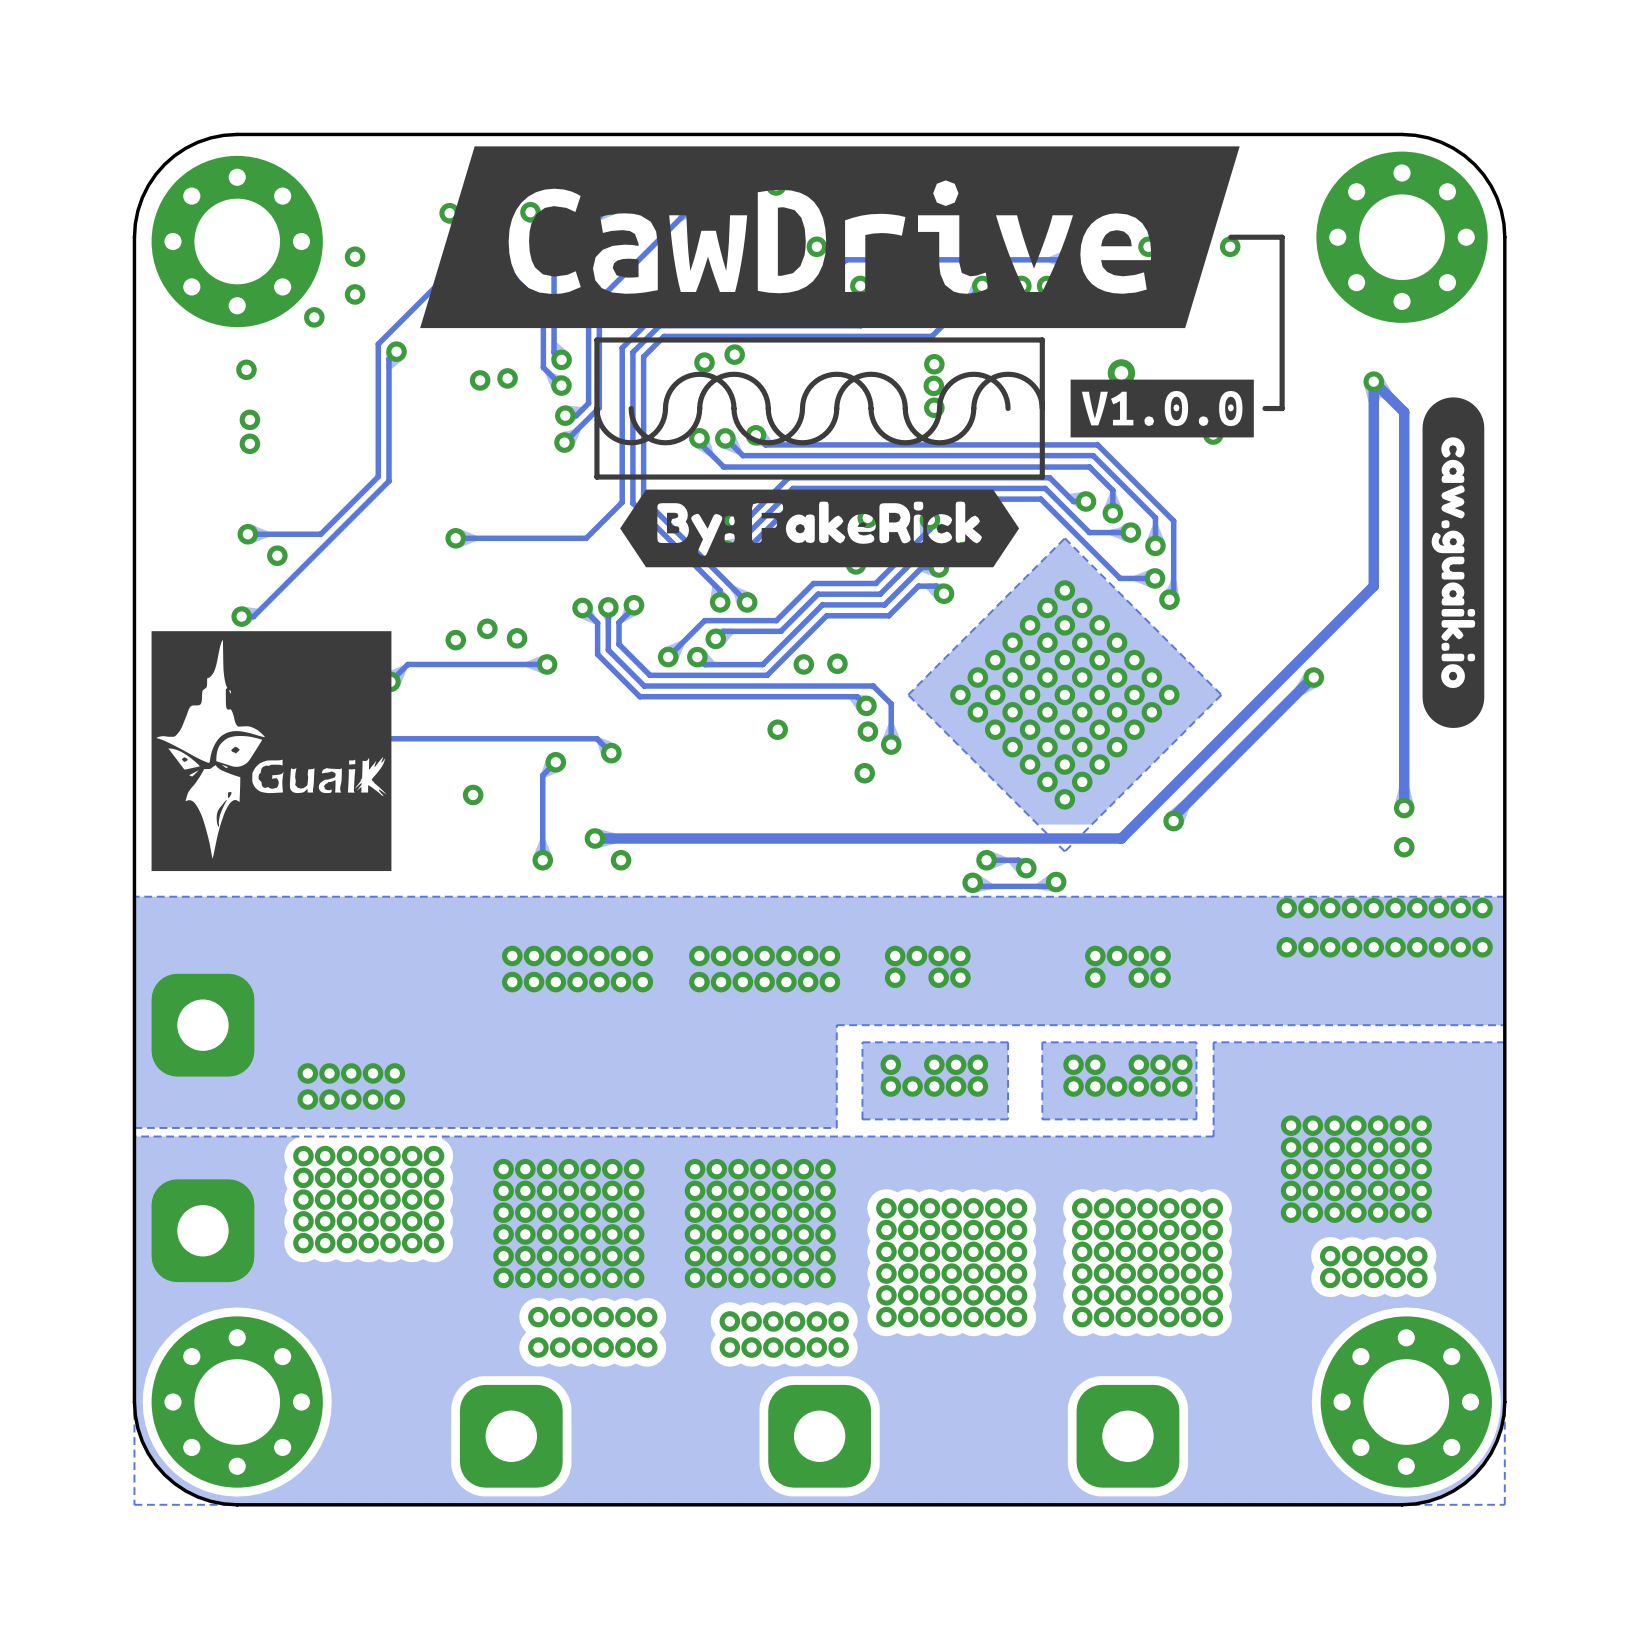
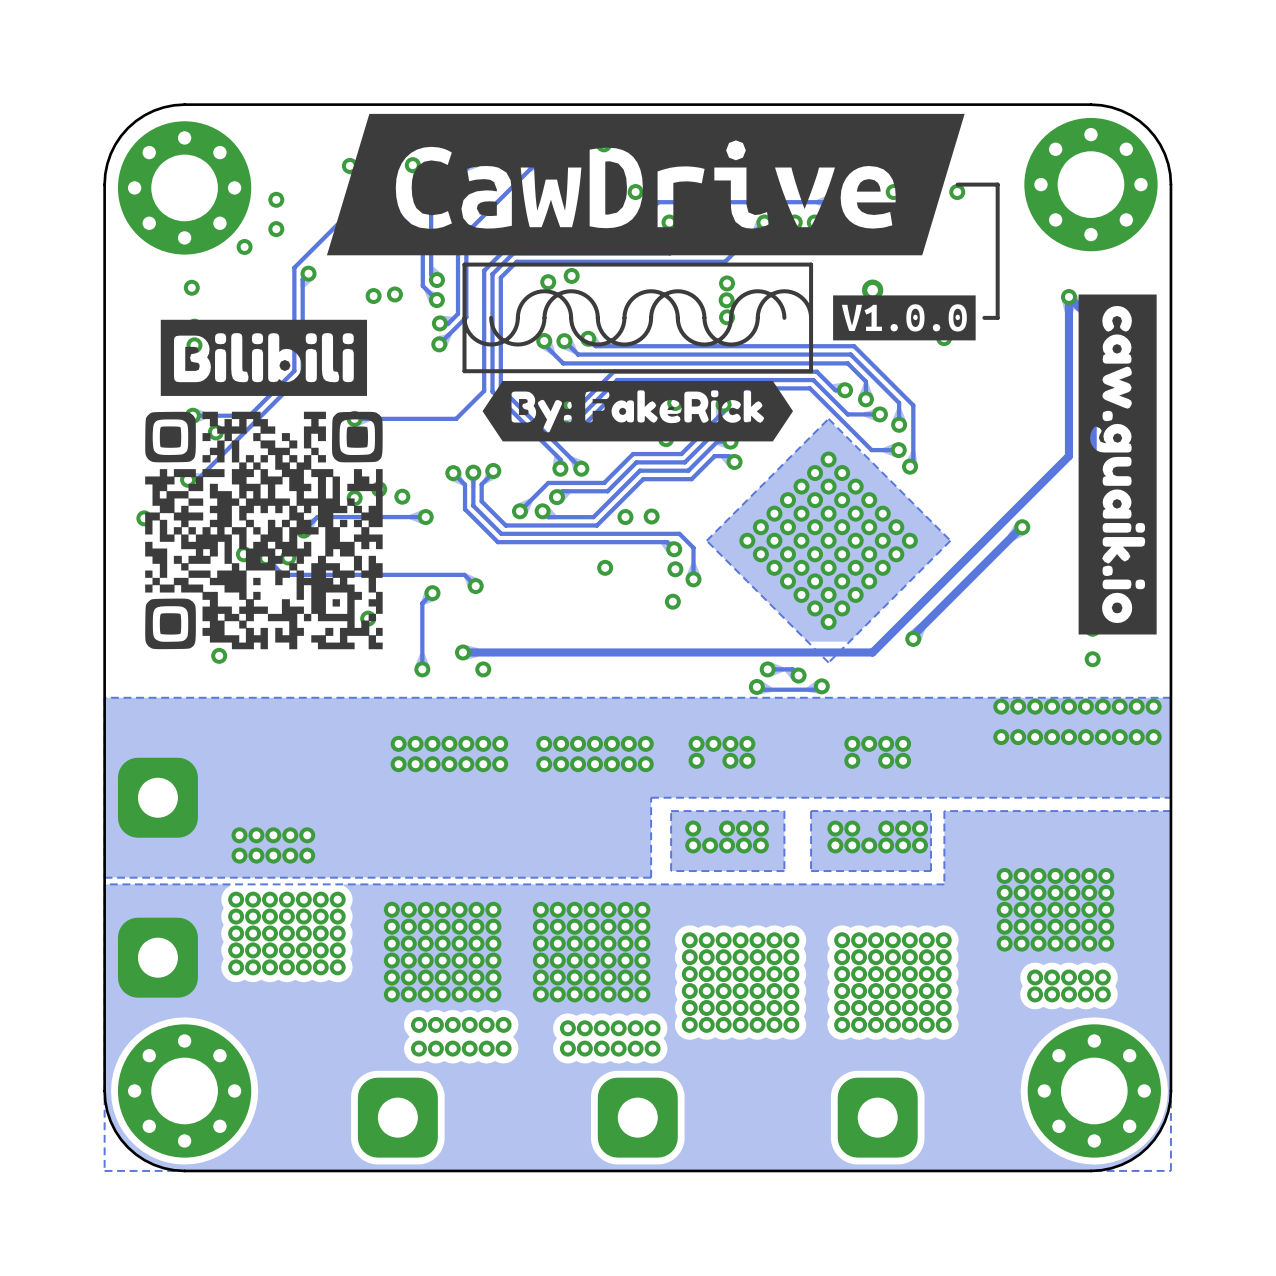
drawing: none -> [1078, 294, 1157, 635]
drawing: [1422, 397, 1485, 728] -> none
drawing: none -> [145, 319, 383, 650]
drawing: [151, 631, 392, 872] -> none

